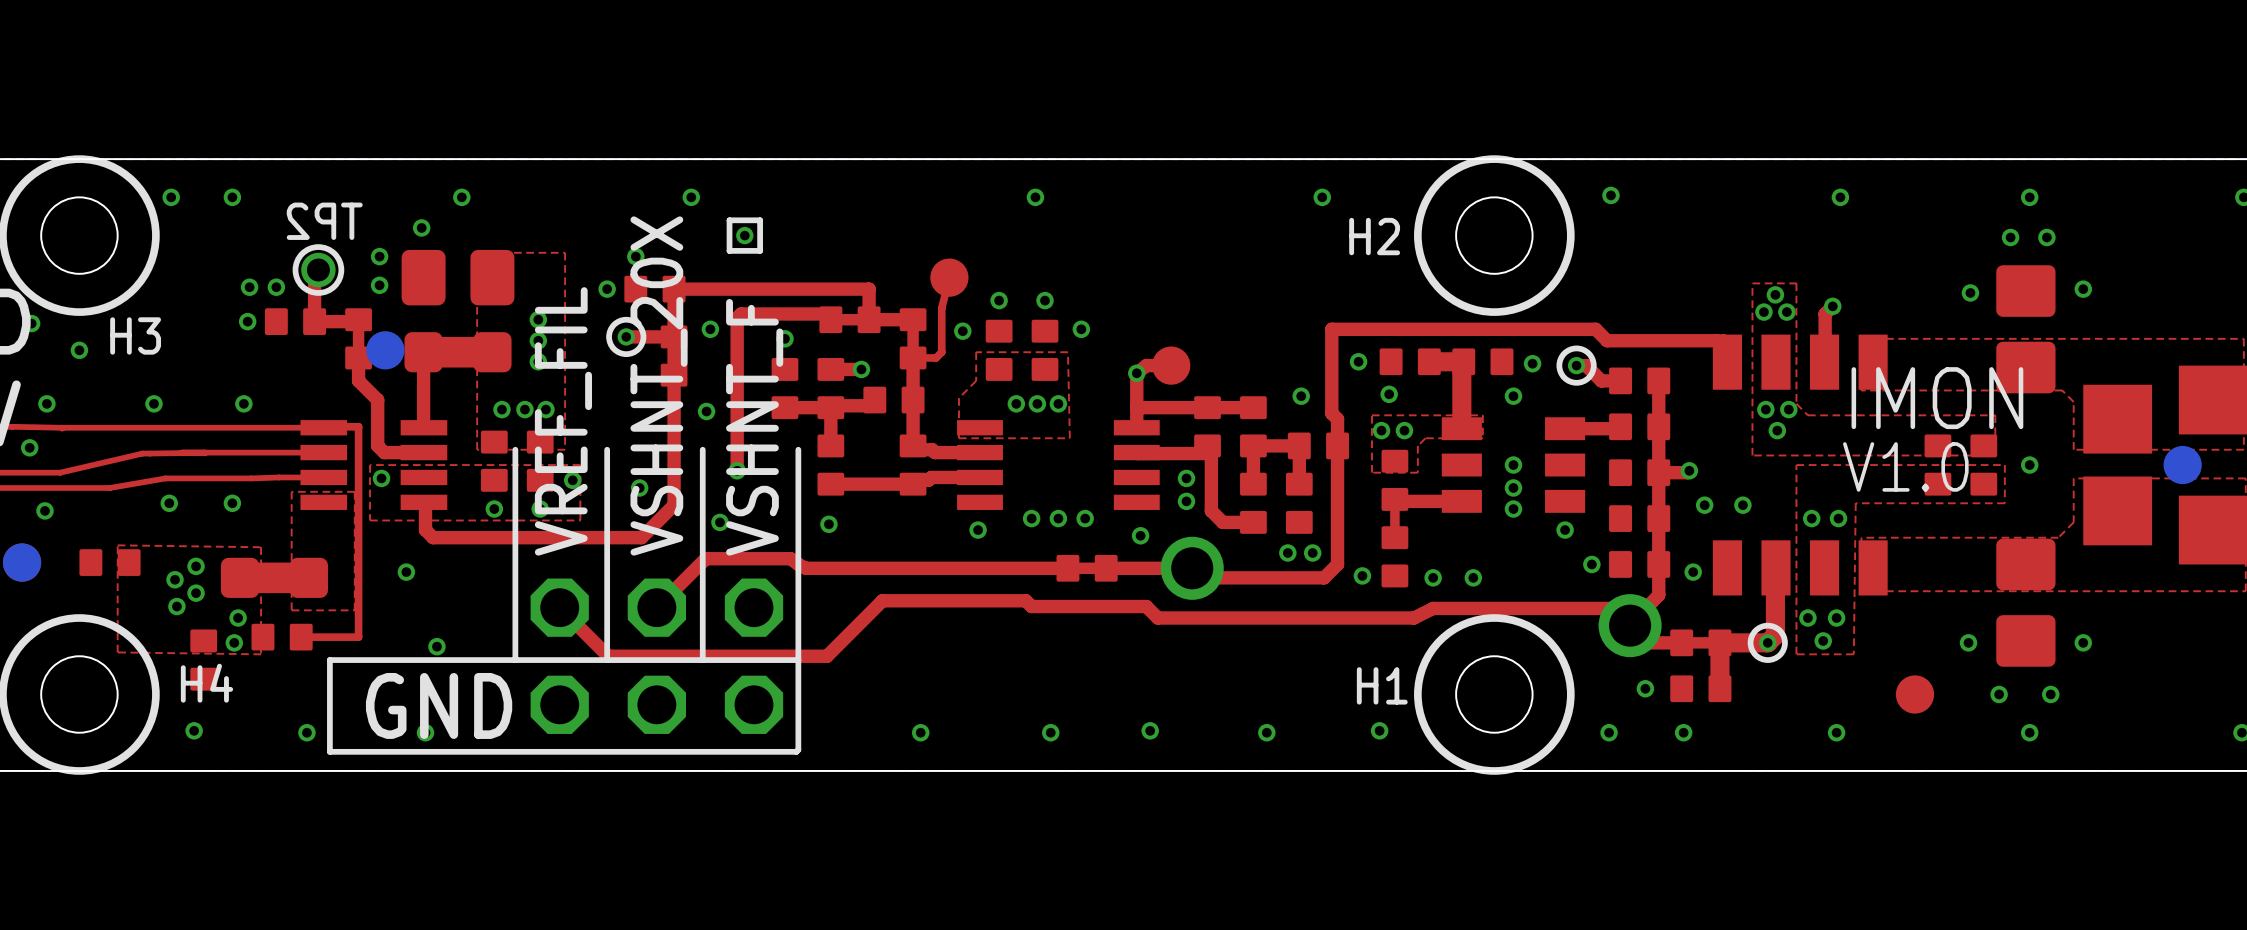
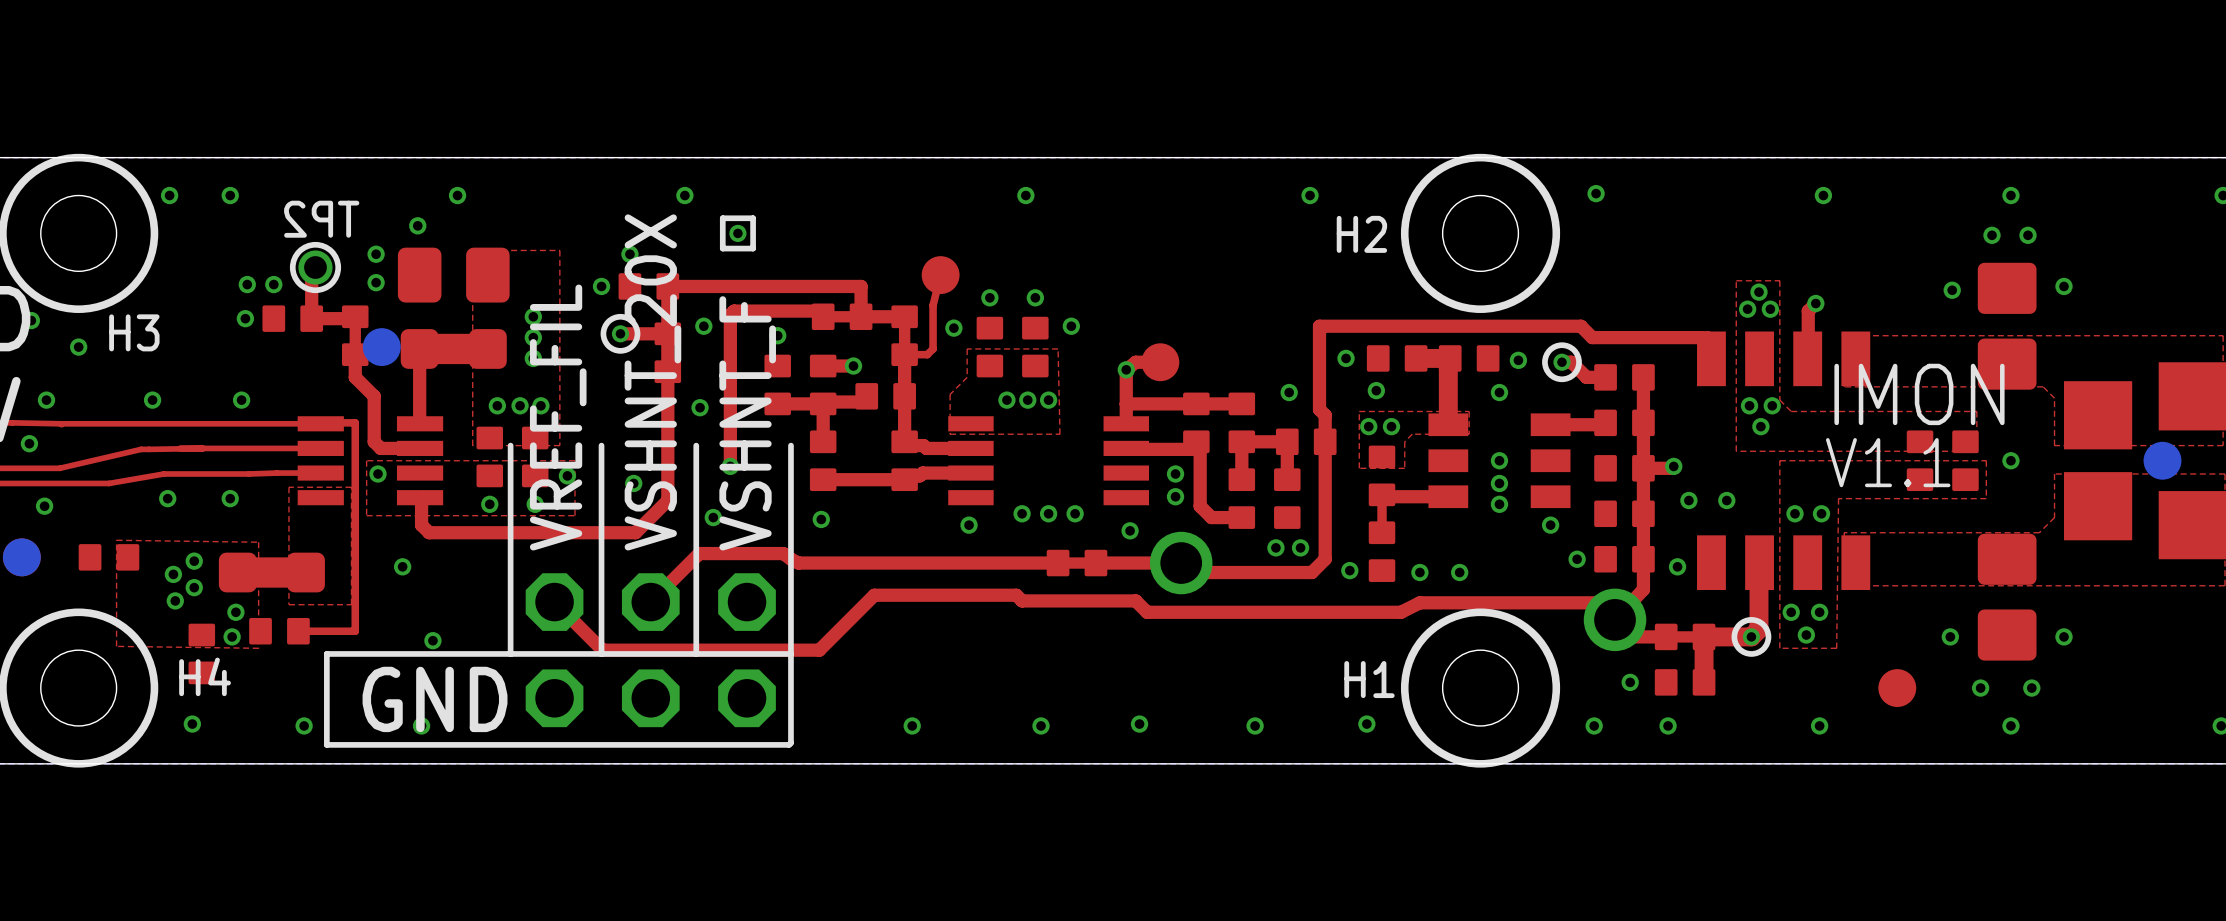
text: V1.0 (1905, 466) -> V1.1 (1888, 462)

